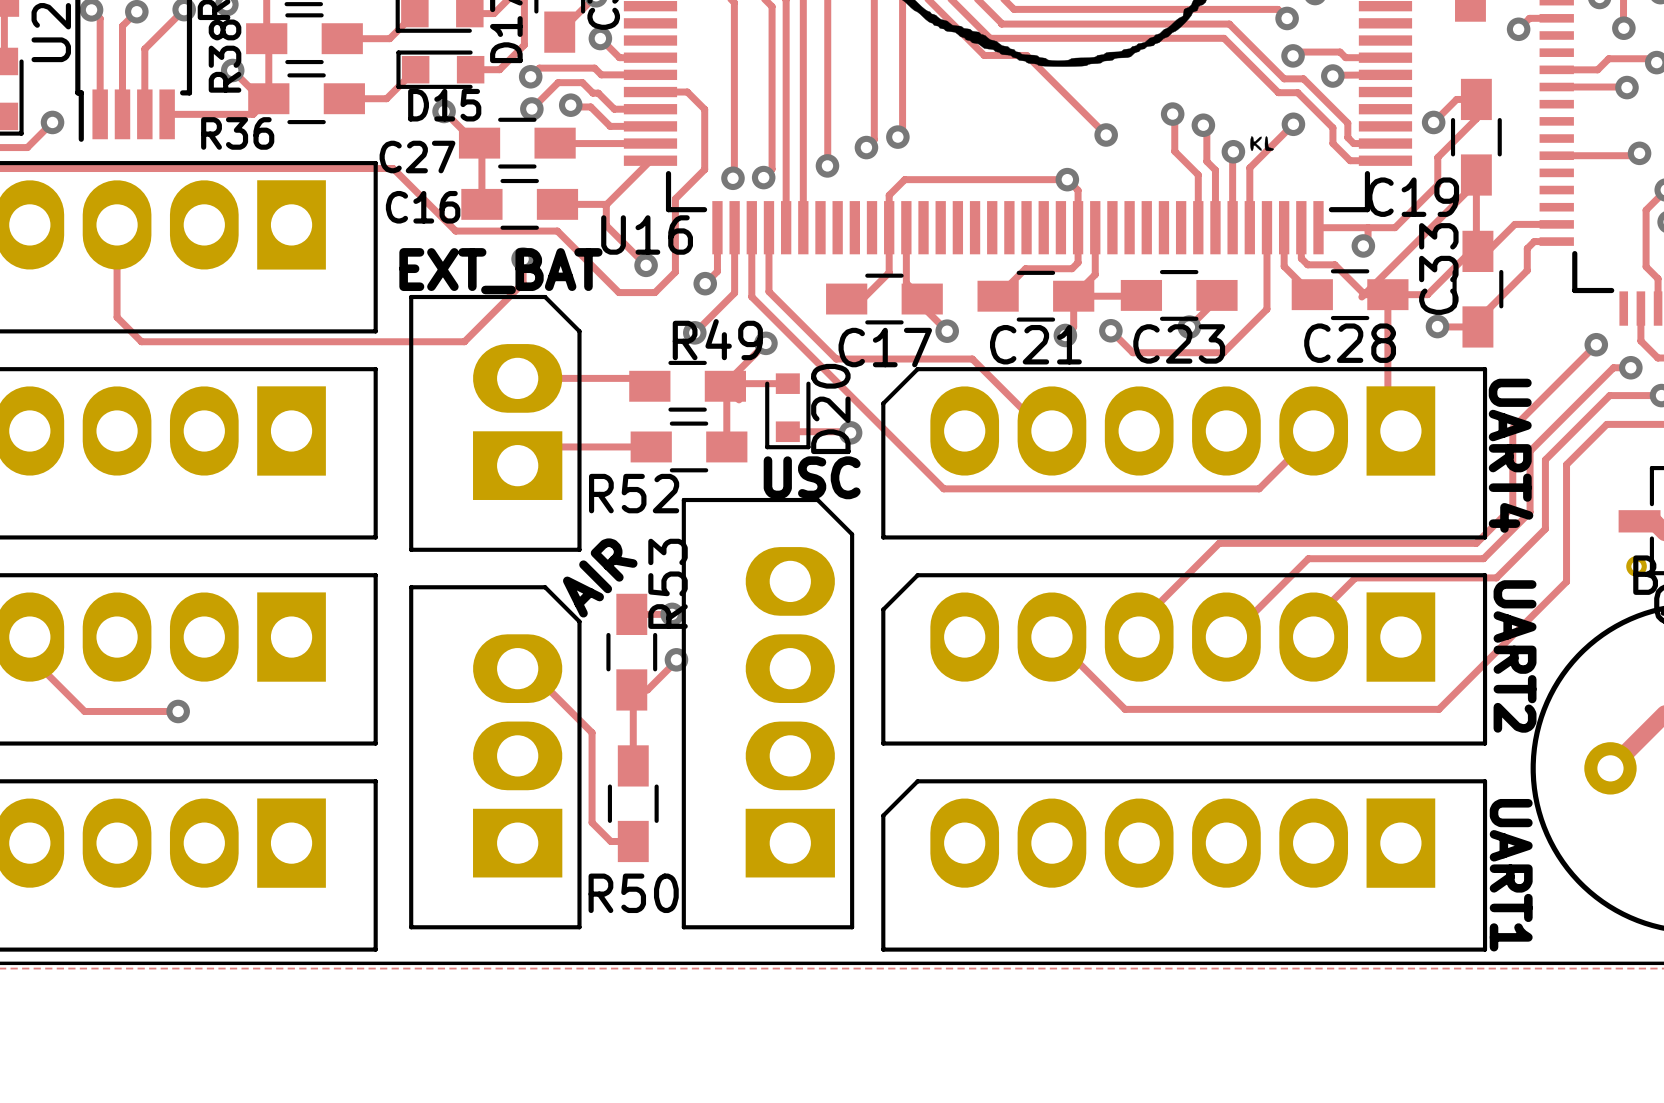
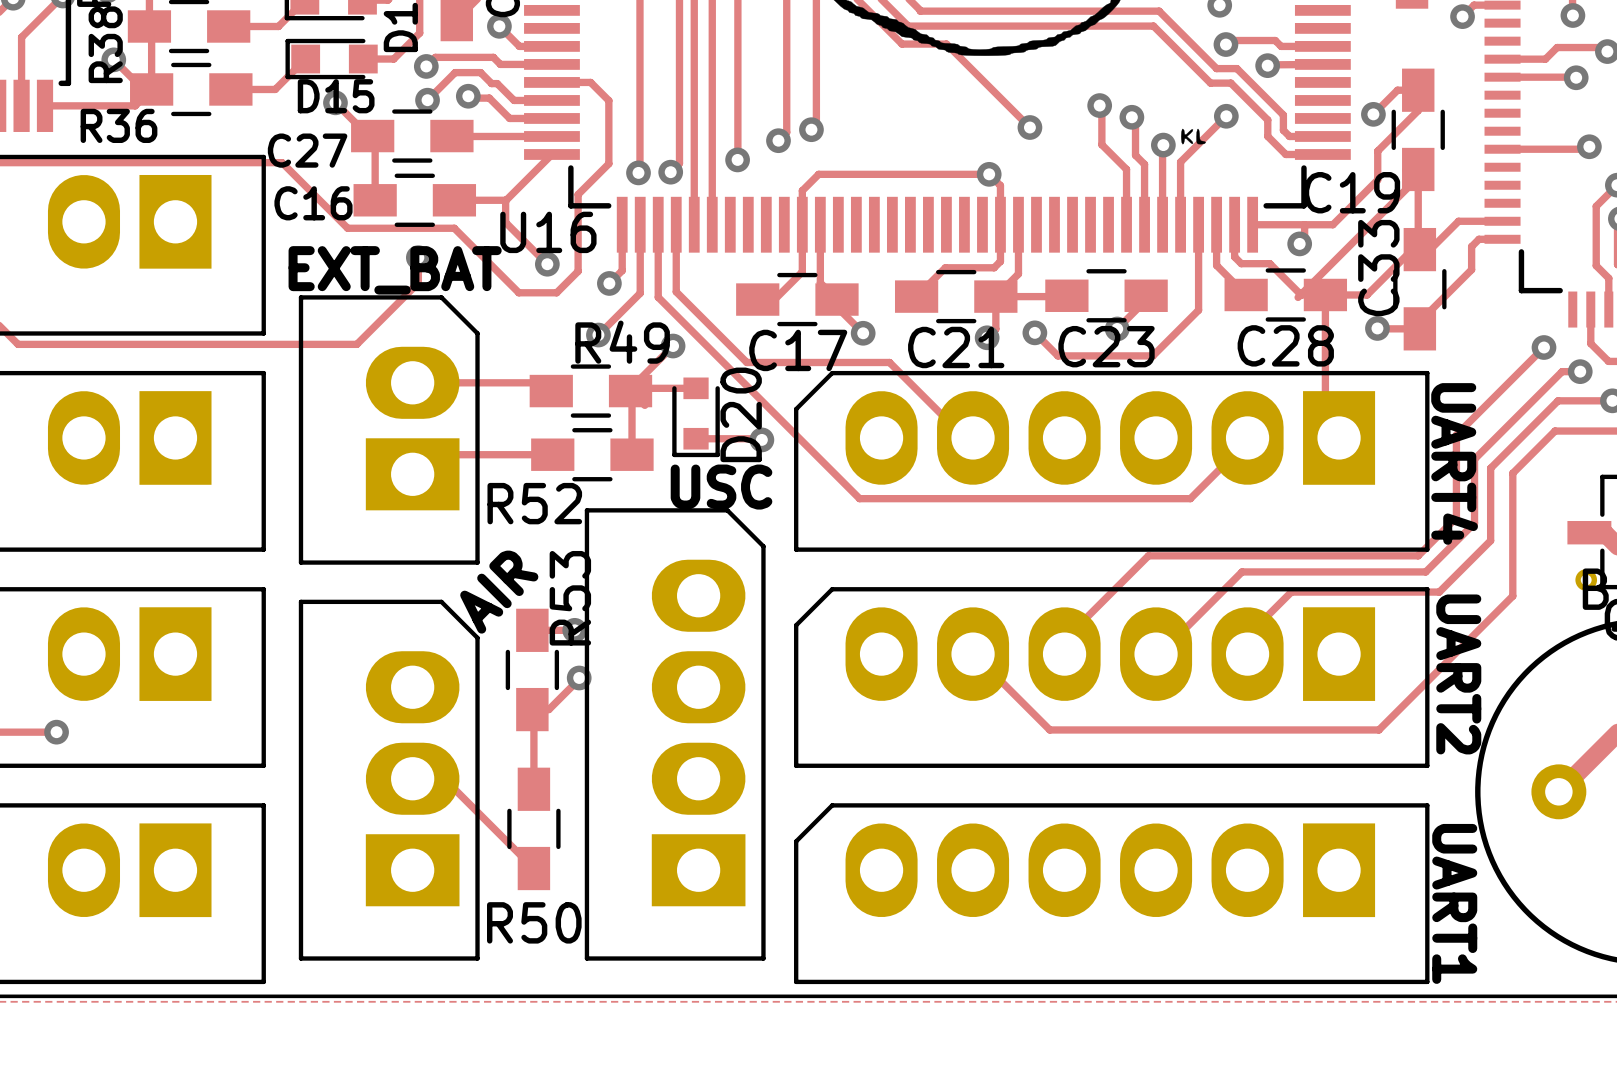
track: (517, 668) (527, 668) (592, 732) (592, 822) (610, 841) (633, 841) -> (412, 778) (444, 778) (533, 868)

